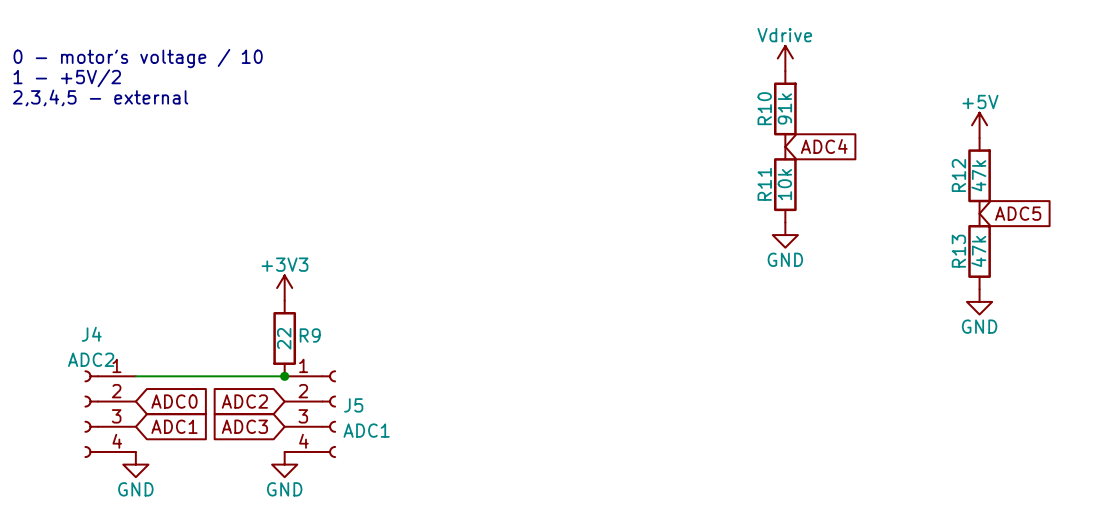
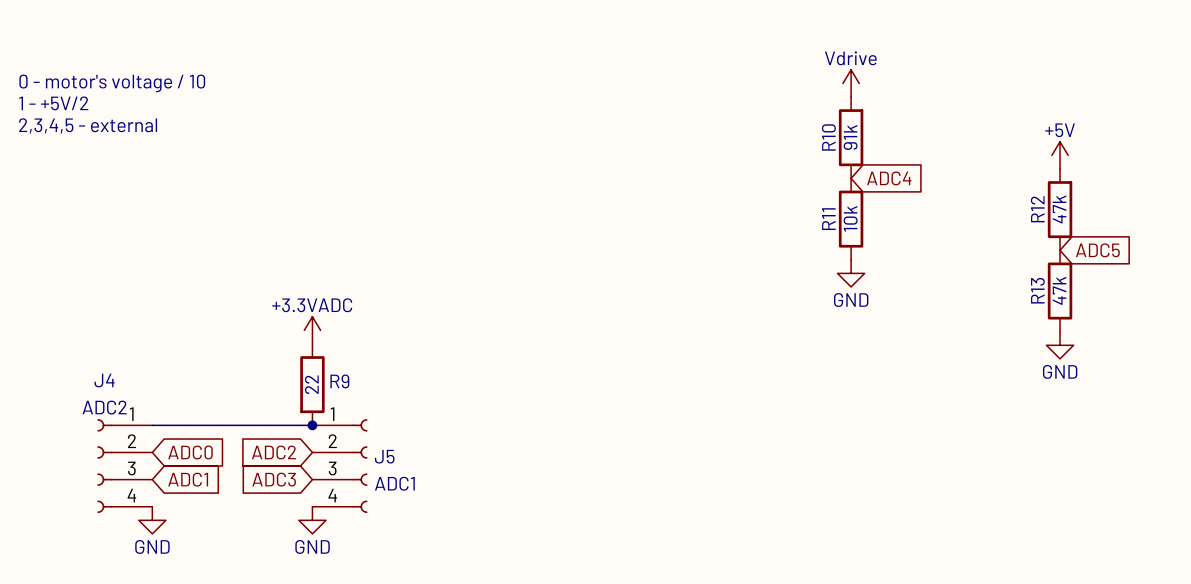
power symbol: +3V3 (284, 288) -> +3.3VADC (312, 330)

